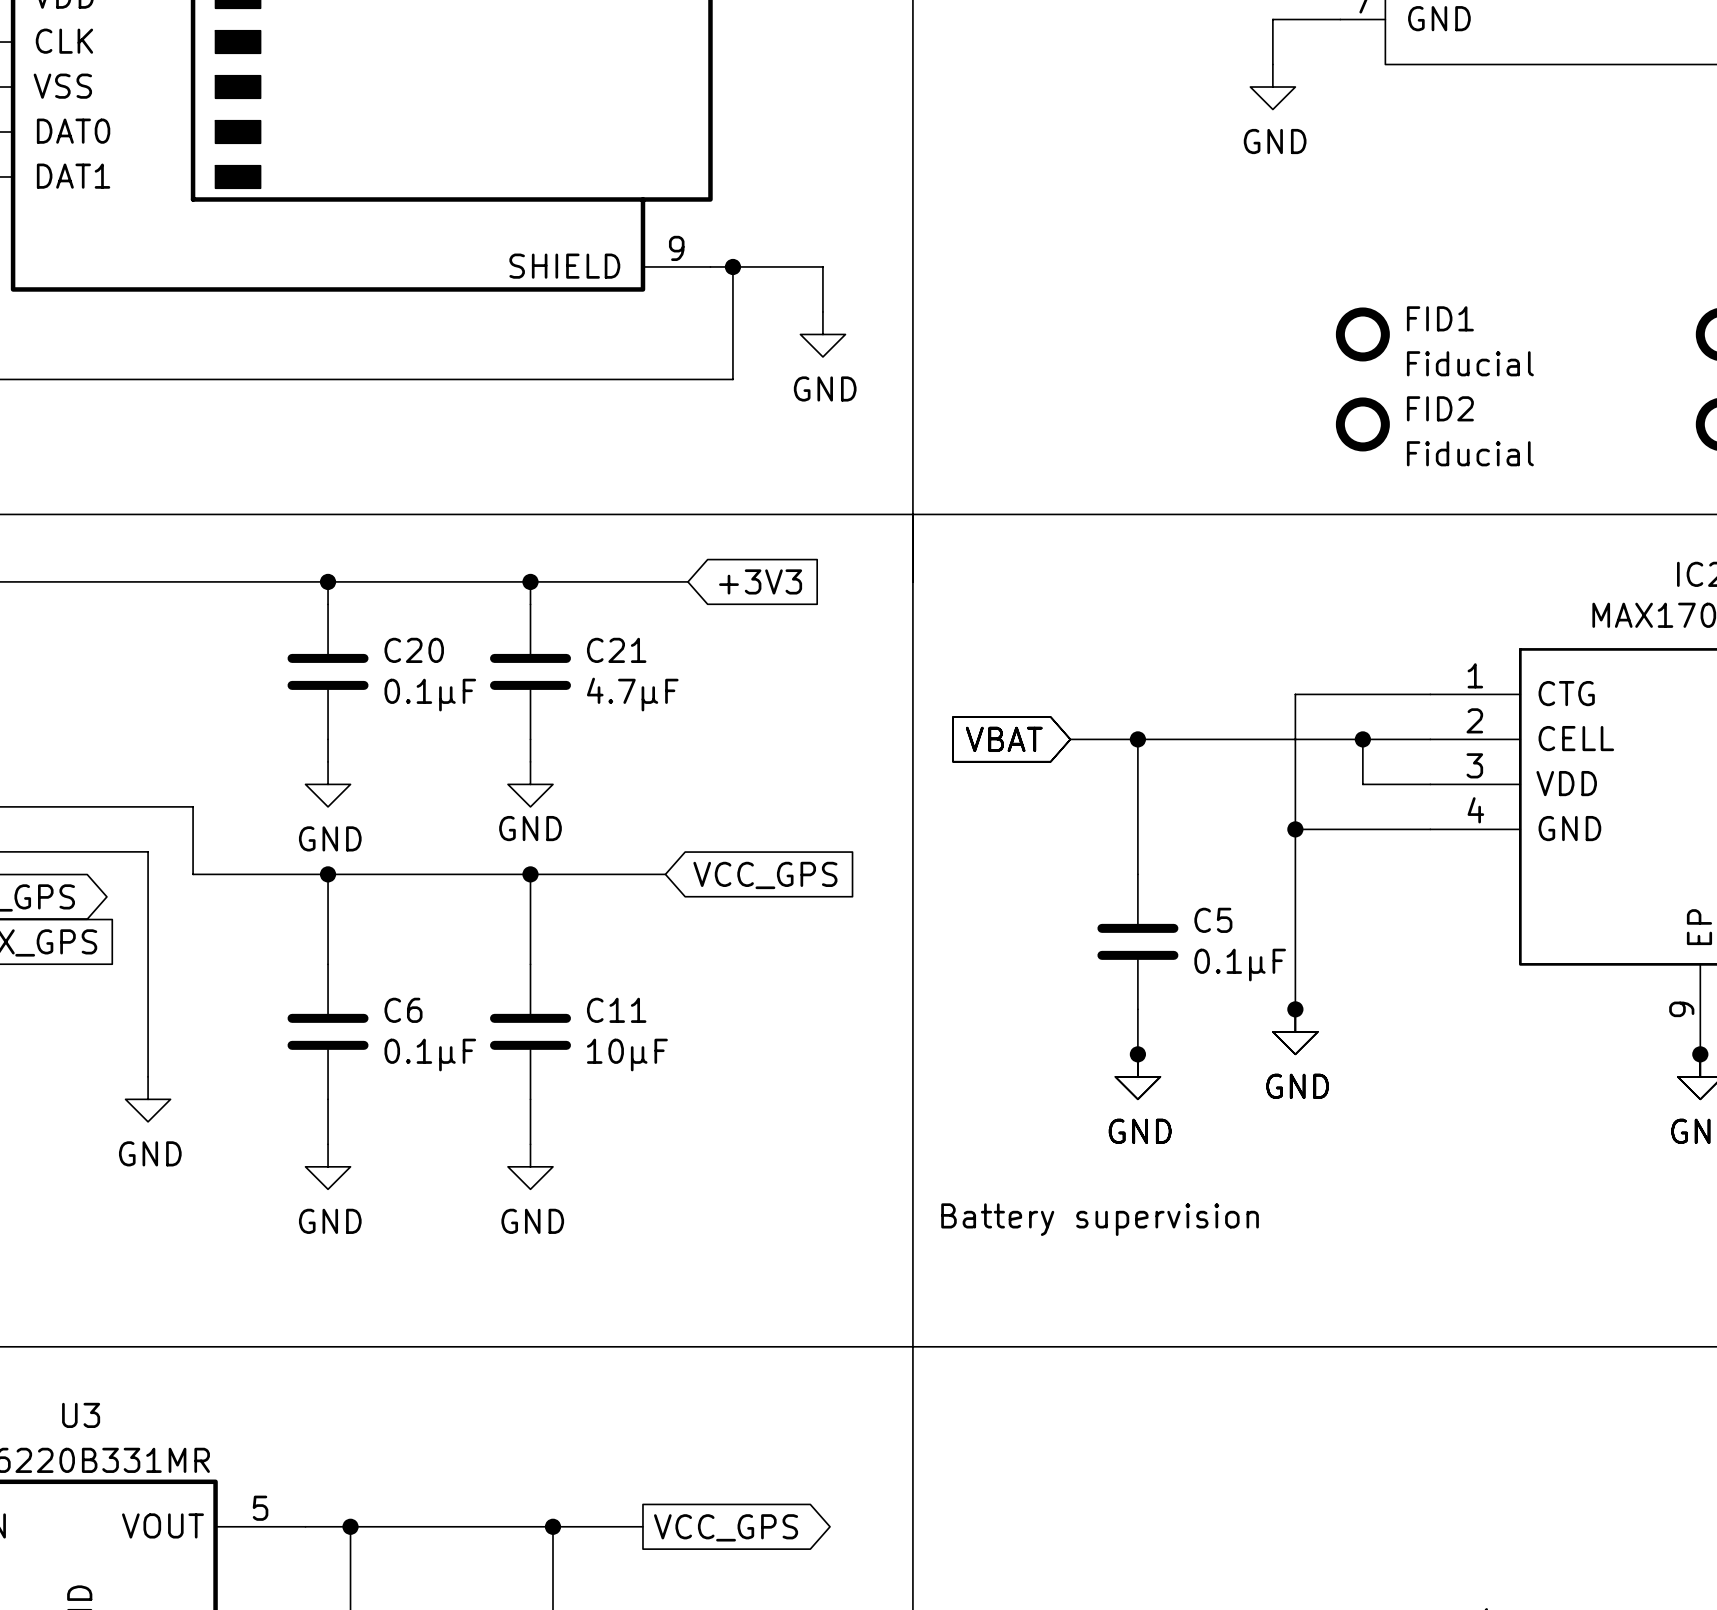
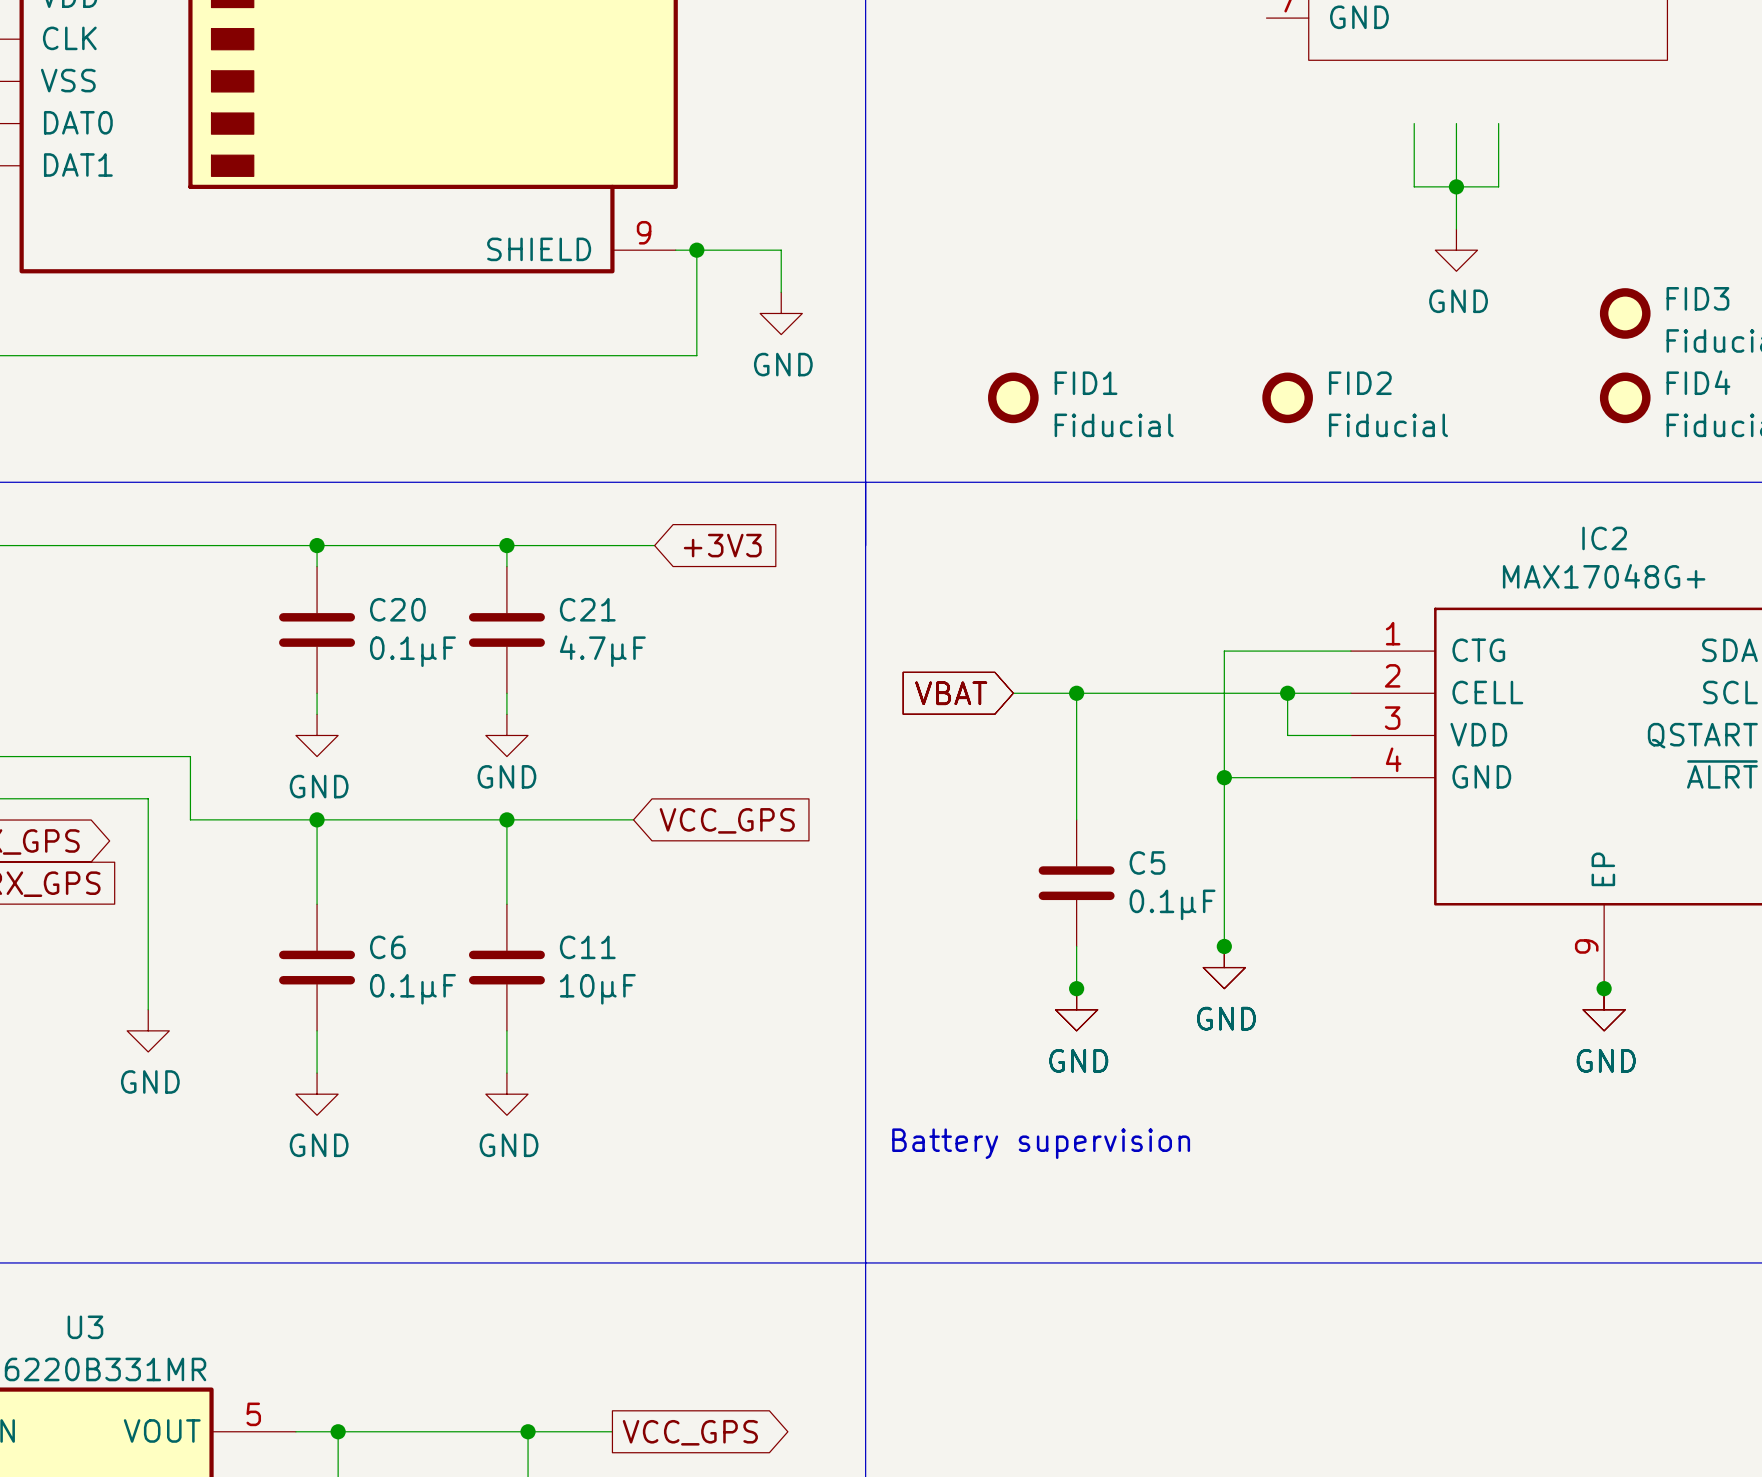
wire: (1340, 19) (1272, 19) (1272, 64) -> none
power symbol position: GND (1272, 87) -> GND (1456, 250)
wire: none -> (1414, 123) (1414, 186) (1498, 186) (1498, 123)
wire: none -> (1456, 123) (1456, 229)
junction: none -> (1456, 186)
FID1 position: (1362, 334) -> (1013, 397)

